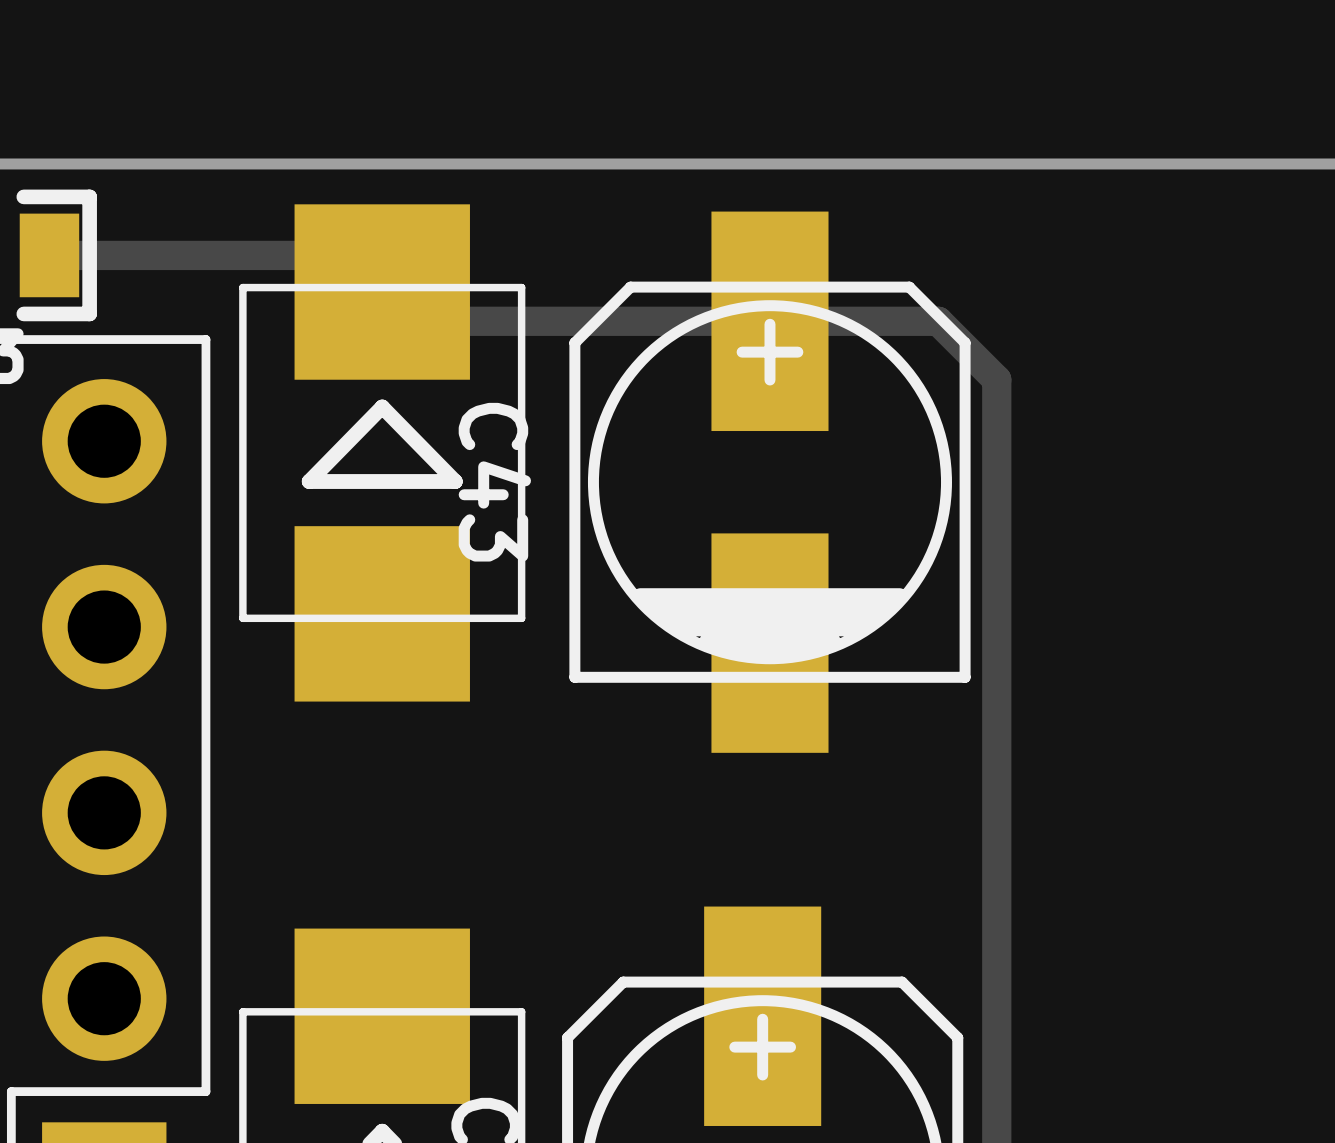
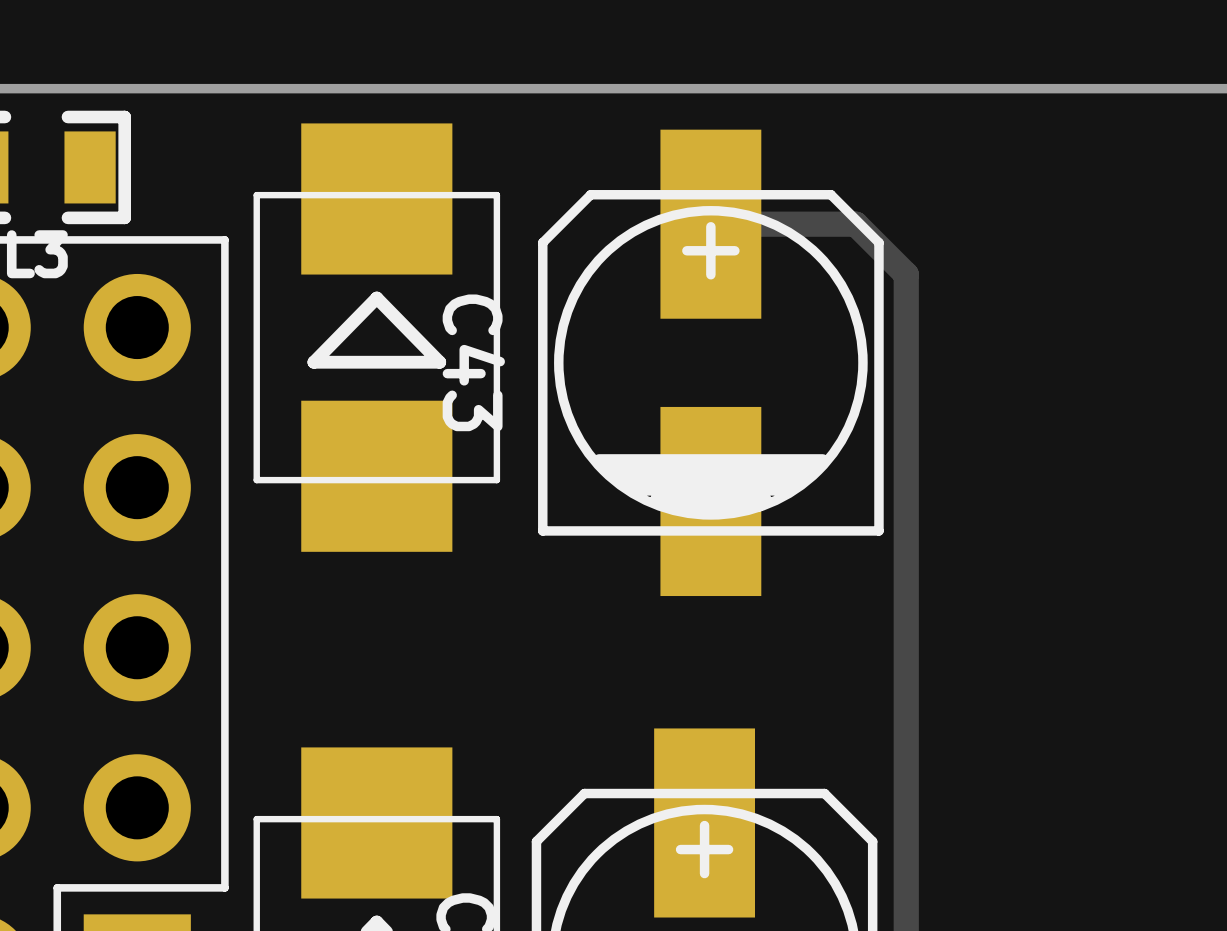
track: (49, 255) (345, 255) (411, 321) (769, 321) -> none

